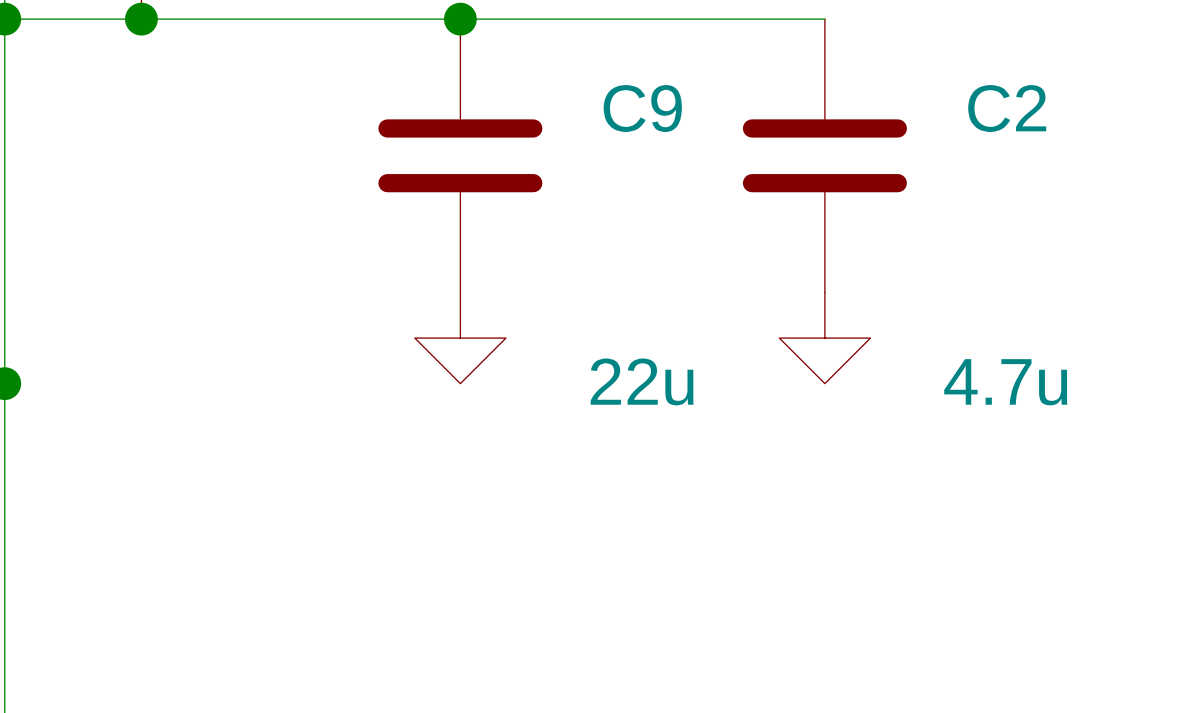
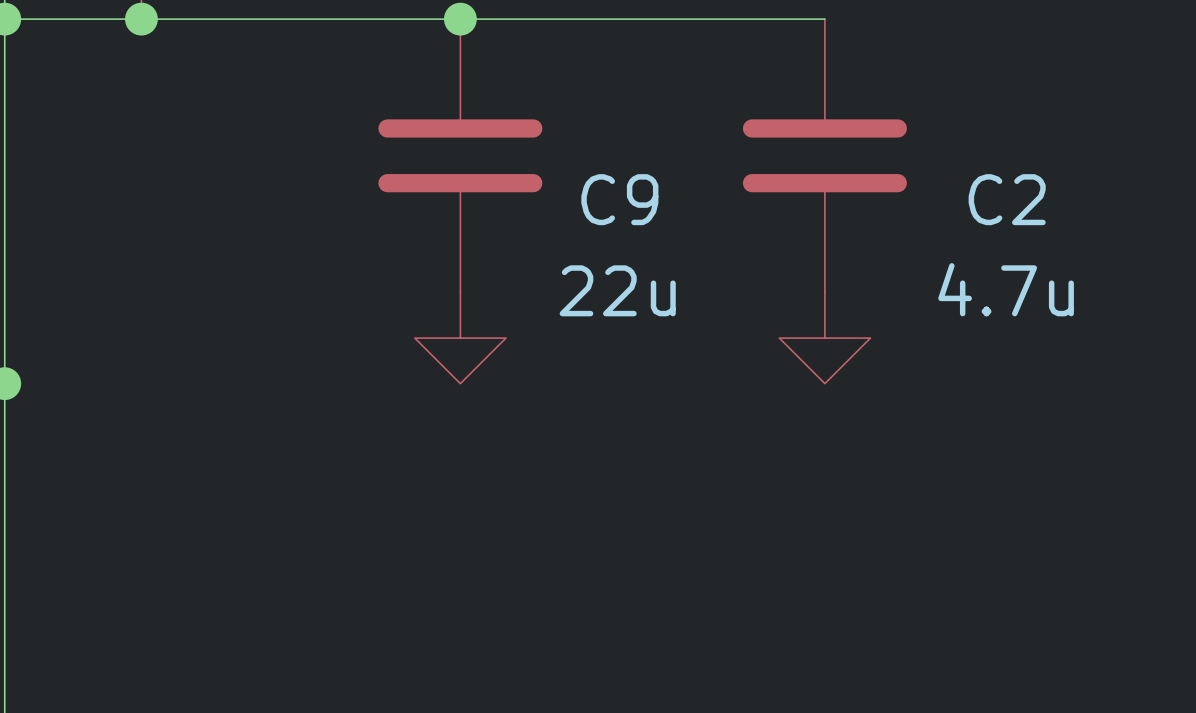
C9 name position: C9 (642, 108) -> C9 (619, 199)
C2 name position: C2 (1007, 108) -> C2 (1007, 199)
C9 value position: 22u (642, 381) -> 22u (617, 290)
C2 value position: 4.7u (1005, 382) -> 4.7u (1006, 289)

